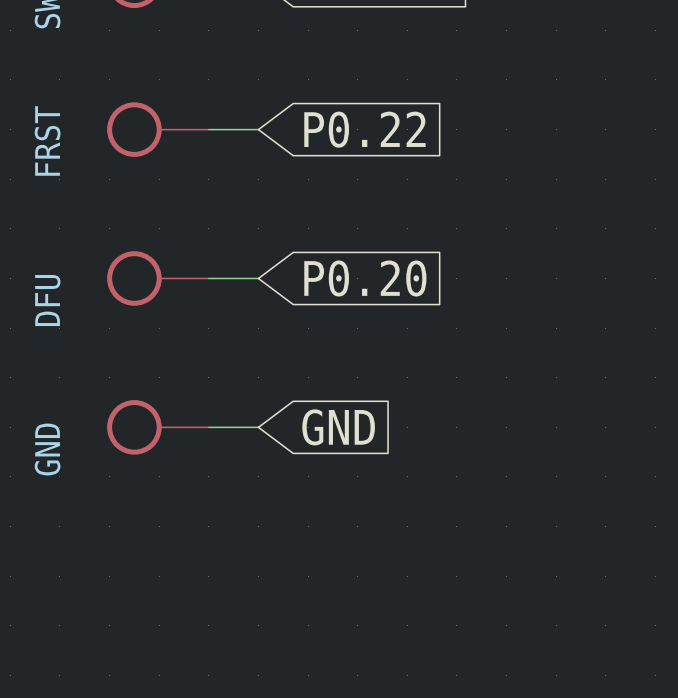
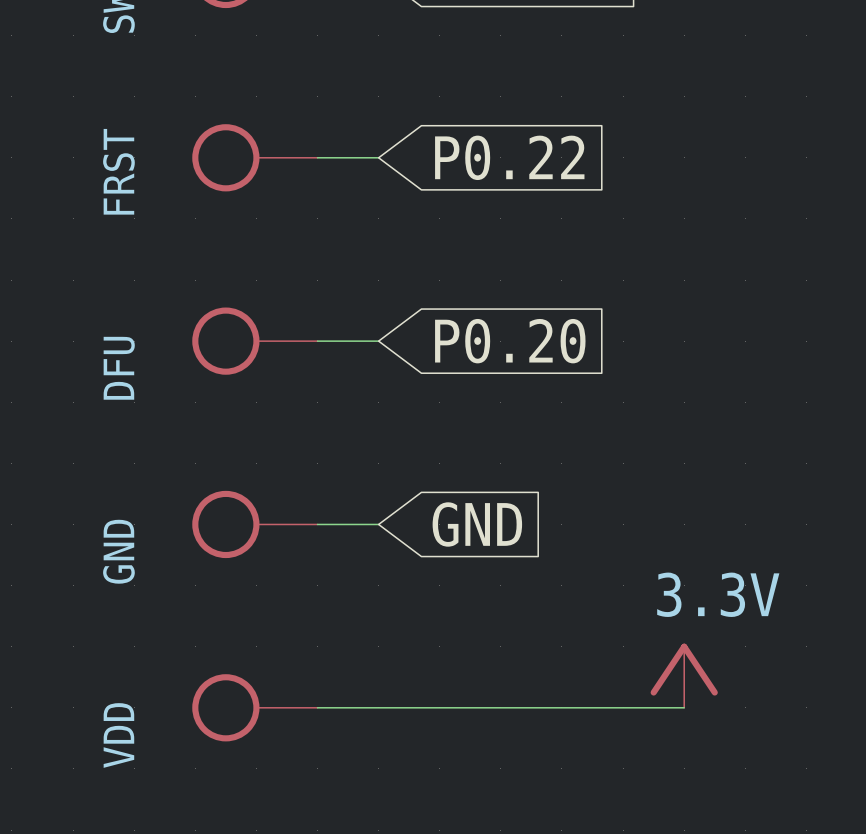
power symbol: none -> 3.3V (684, 675)
VDD: none -> (254, 707)
wire: none -> (317, 707) (684, 707)

